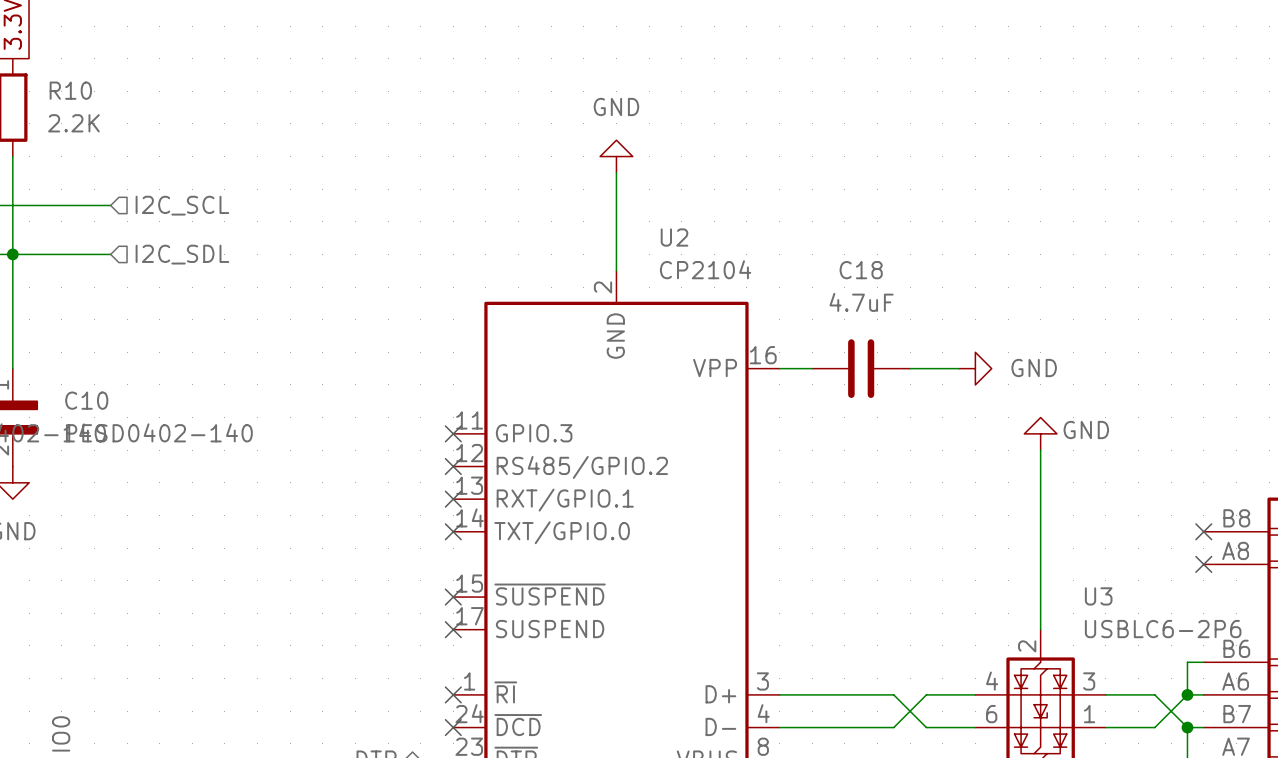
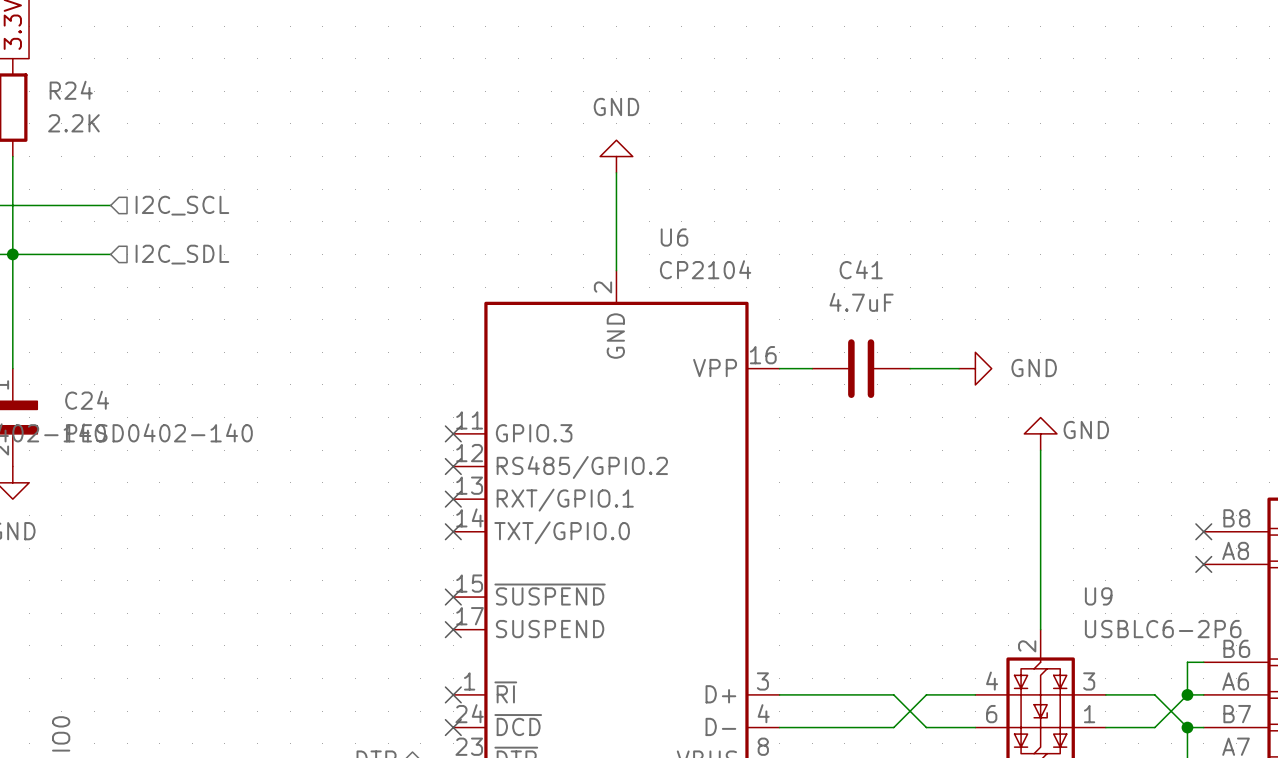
R10 name: R10 (70, 90) -> R24 (71, 90)
U2 name: U2 (674, 237) -> U6 (674, 237)
C18 name: C18 (861, 270) -> C41 (861, 269)
C10 name: C10 (86, 400) -> C24 (87, 400)
U3 name: U3 (1098, 596) -> U9 (1098, 596)

